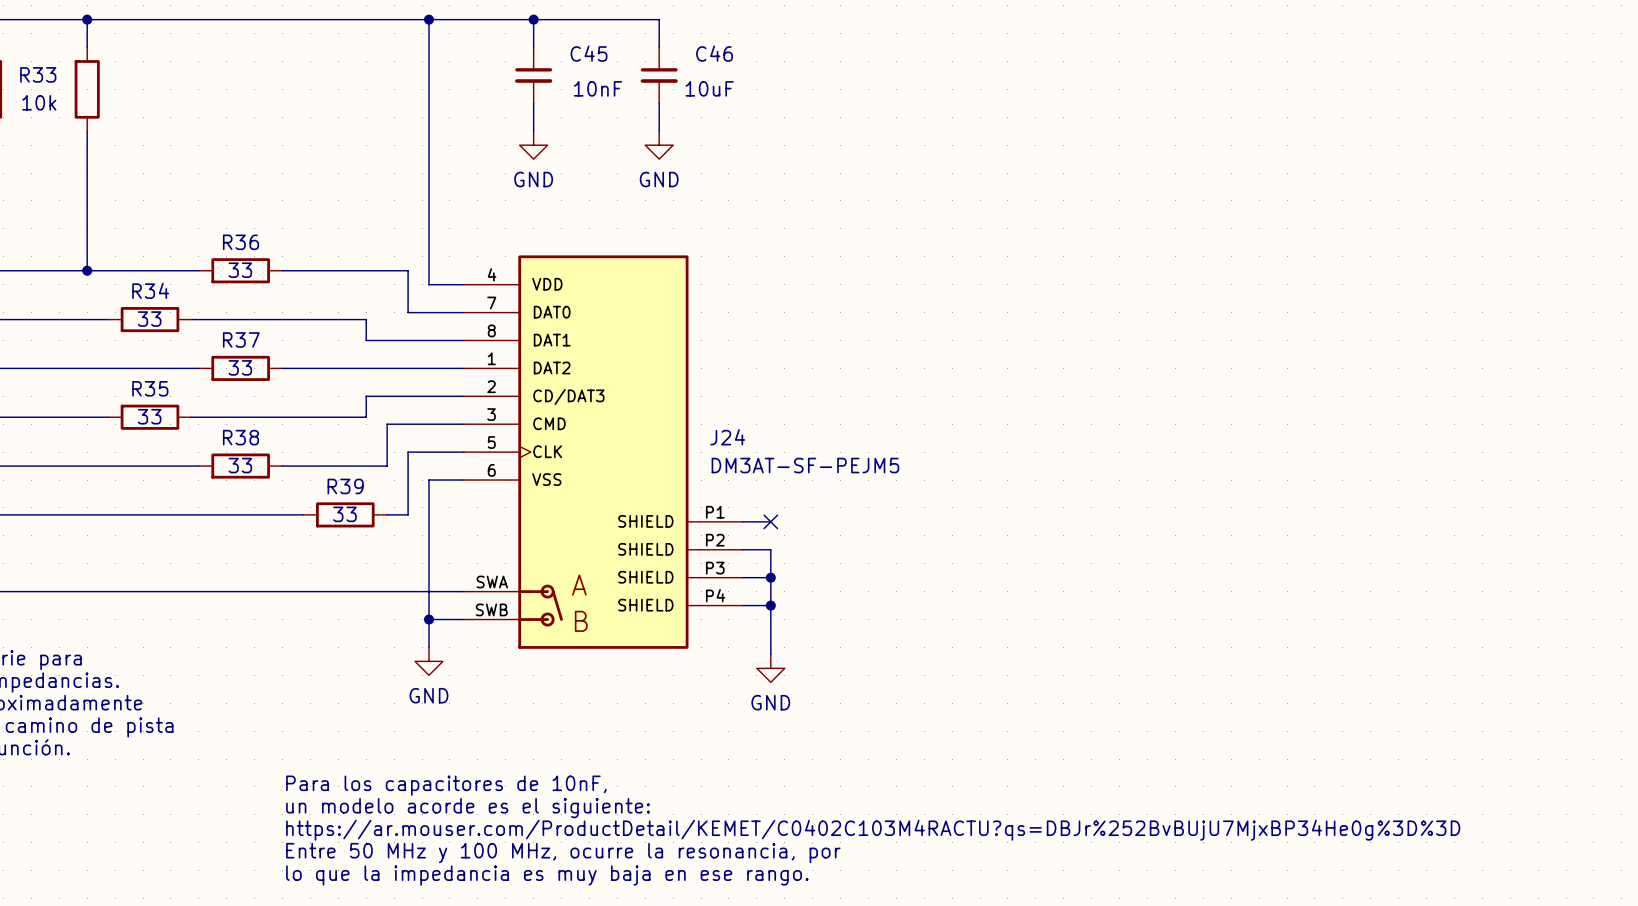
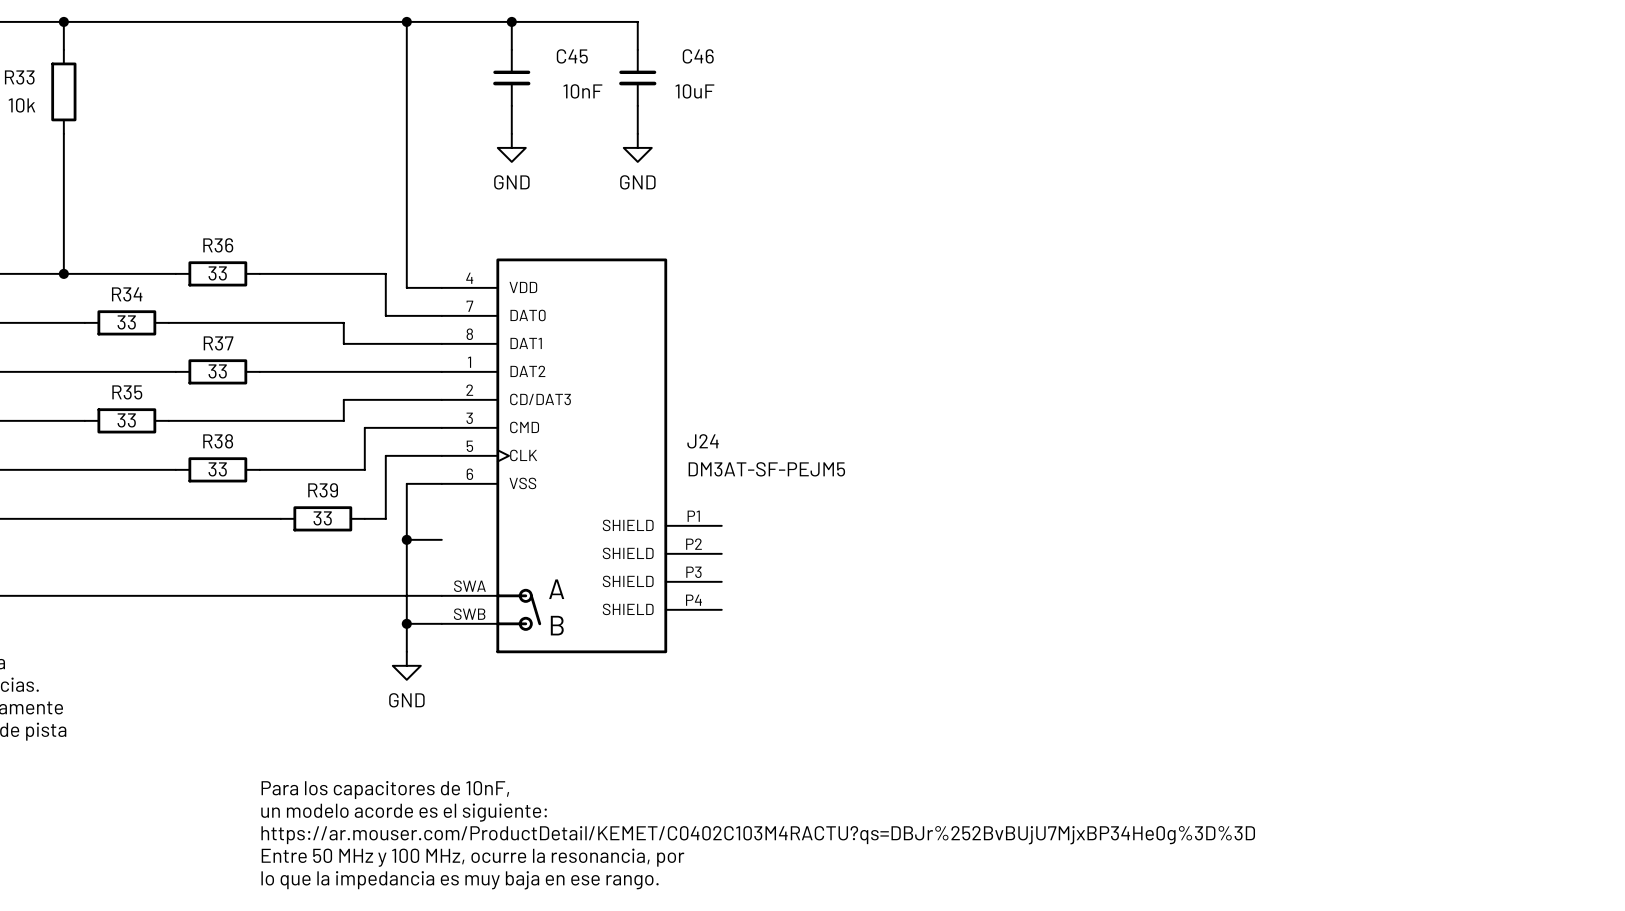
wire: (742, 521) (770, 521) -> none
no-connect mark: (770, 521) -> none
wire: none -> (406, 539) (441, 539)
junction: none -> (406, 539)
wire: (742, 549) (770, 549) (770, 654) -> none
wire: (742, 577) (770, 577) -> none
junction: (770, 577) -> none
wire: (742, 605) (770, 605) -> none
junction: (770, 605) -> none
power symbol: GND (770, 668) -> none

